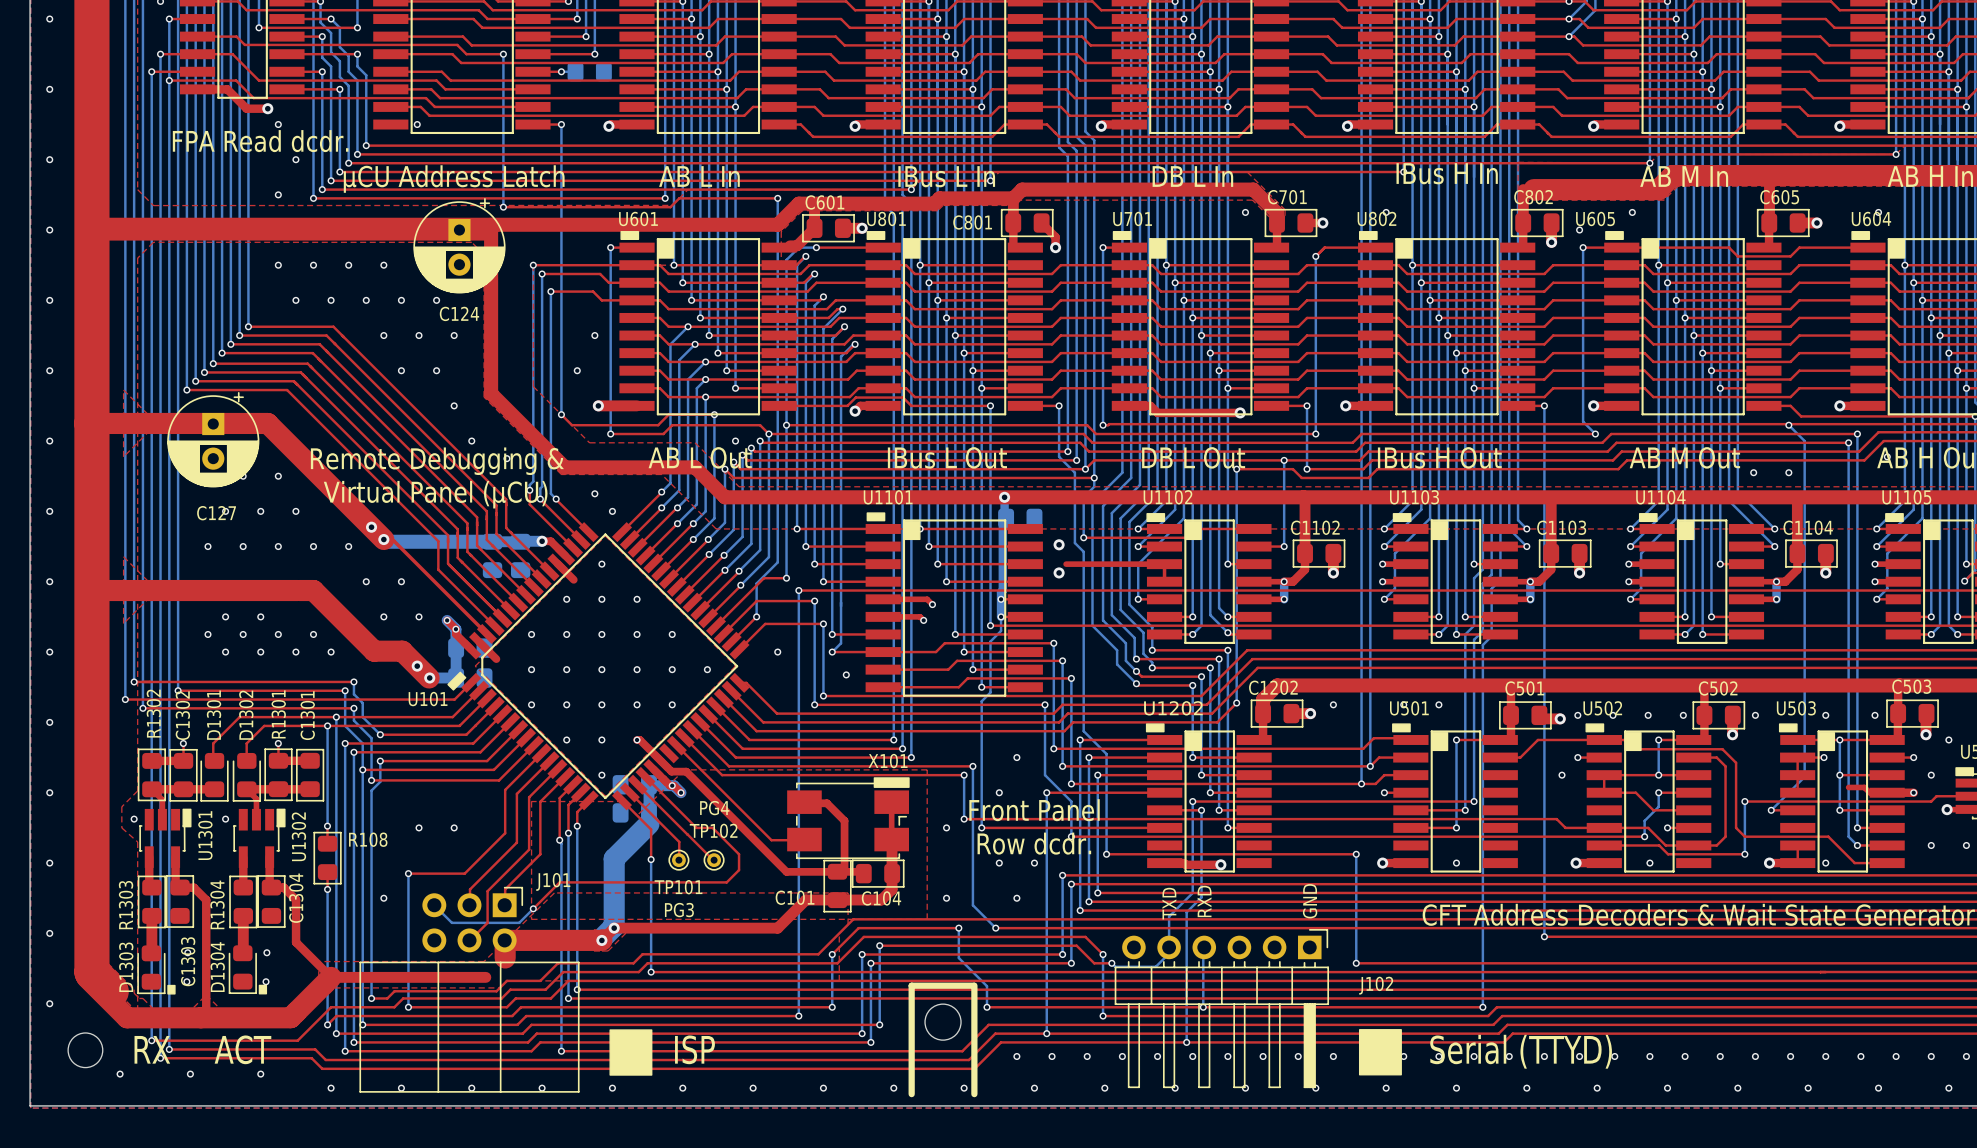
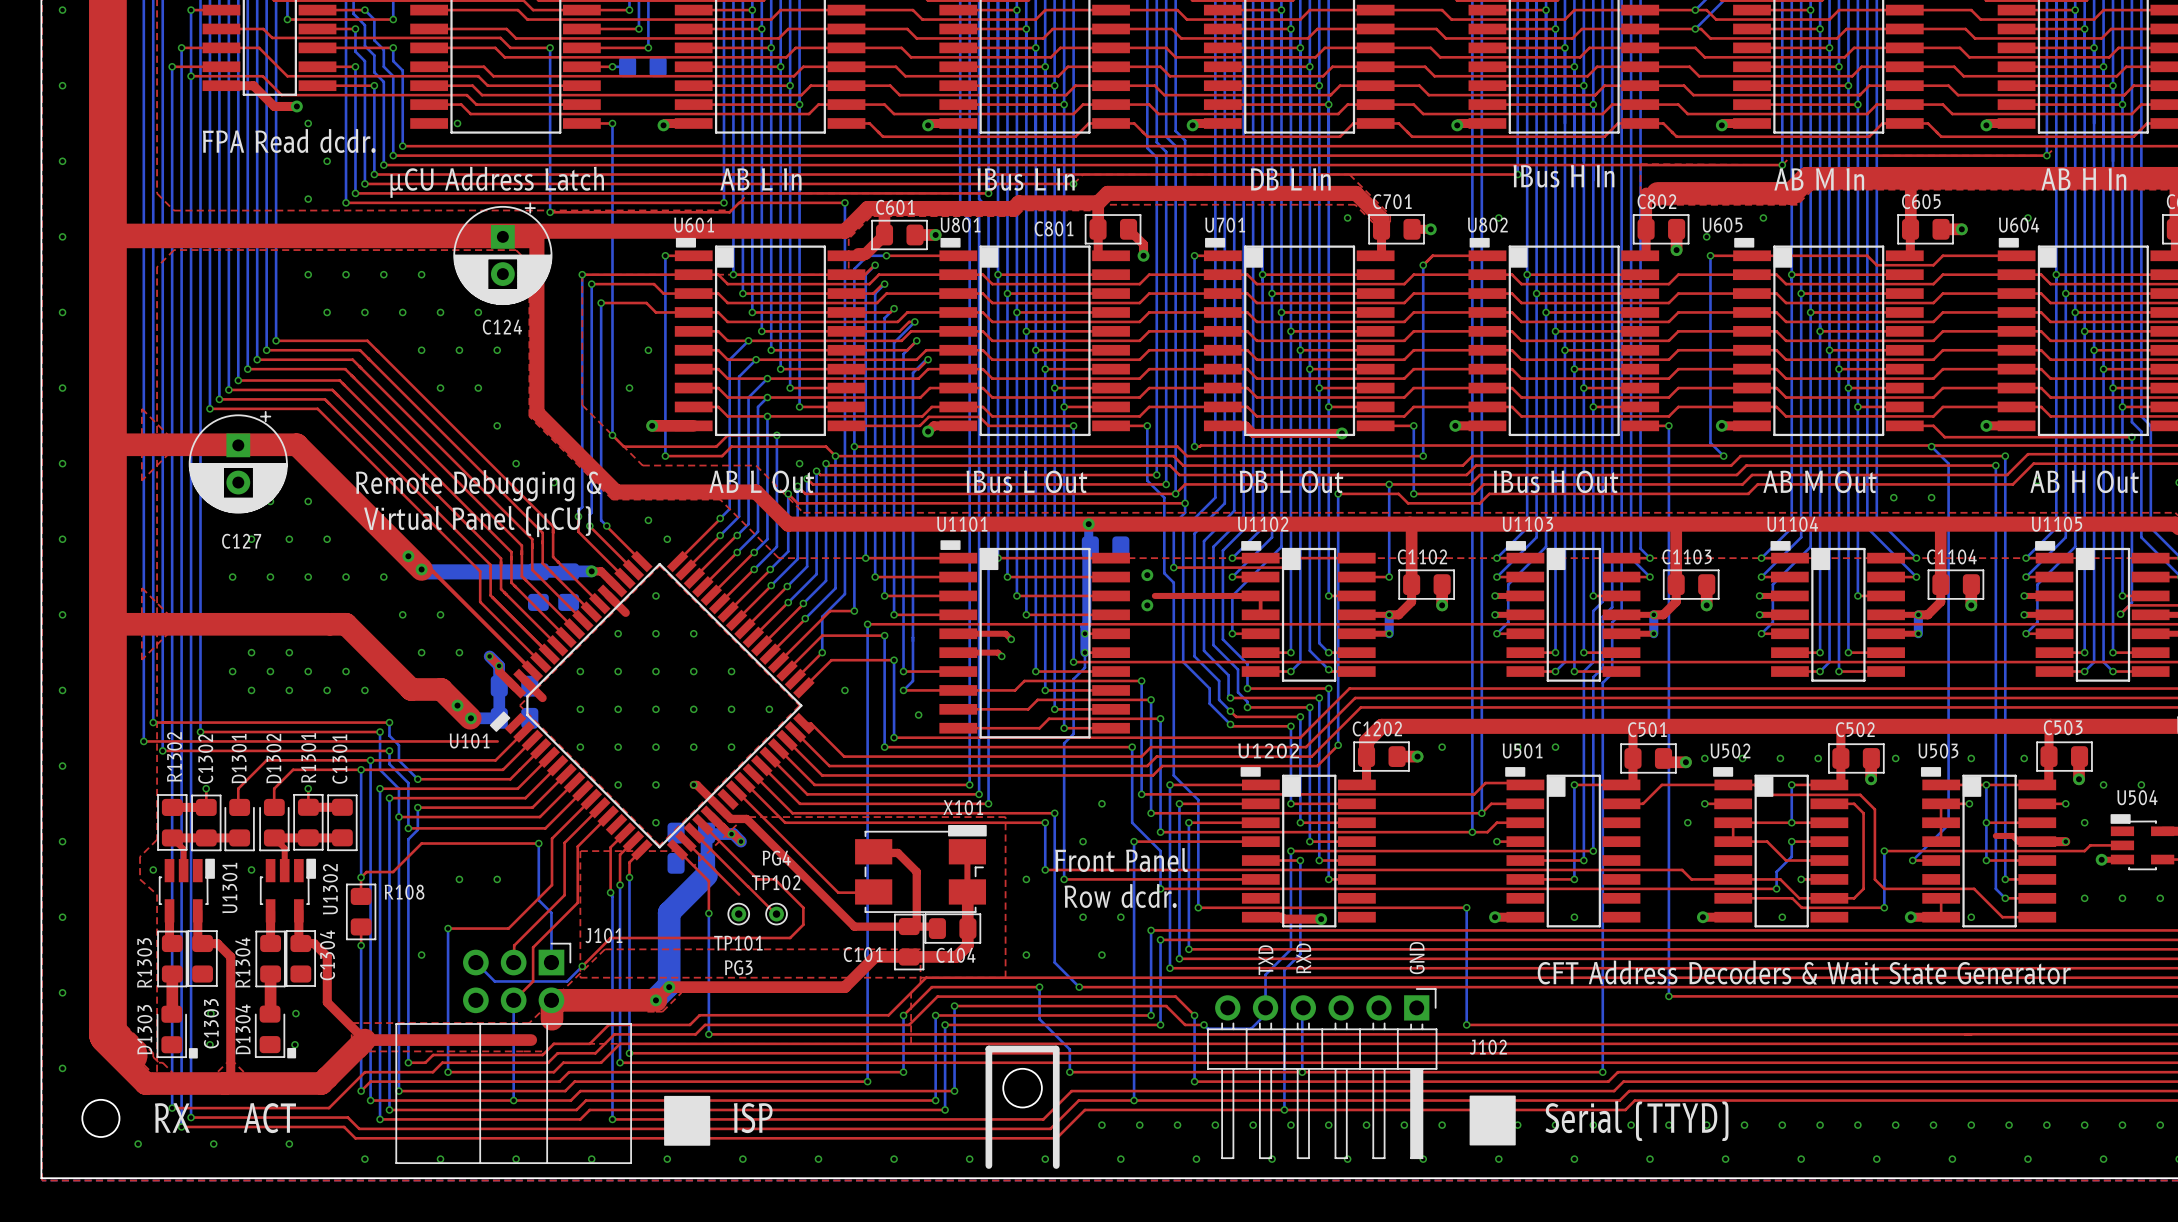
top track: (471, 682) (454, 699) -> none
top track: (565, 776) (540, 801) (540, 854) (505, 889) (505, 905) -> none
top track: none -> (538, 843) (421, 843) (393, 872) (366, 872) (361, 877)
bottom track: none -> (538, 843) (538, 900) (551, 912) (551, 962)
via: none -> (538, 843)
top track: (679, 841) (679, 859) -> none
bottom track: none -> (513, 1000) (513, 1100)
via: none -> (513, 1100)

